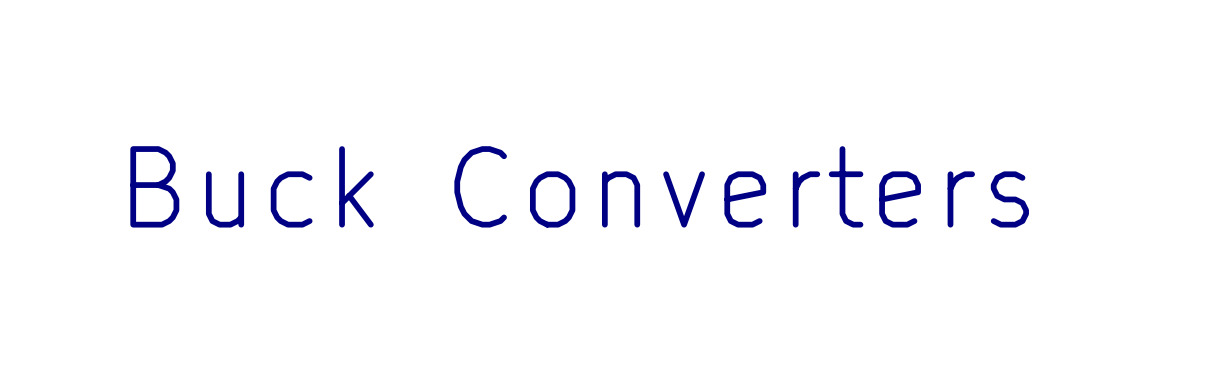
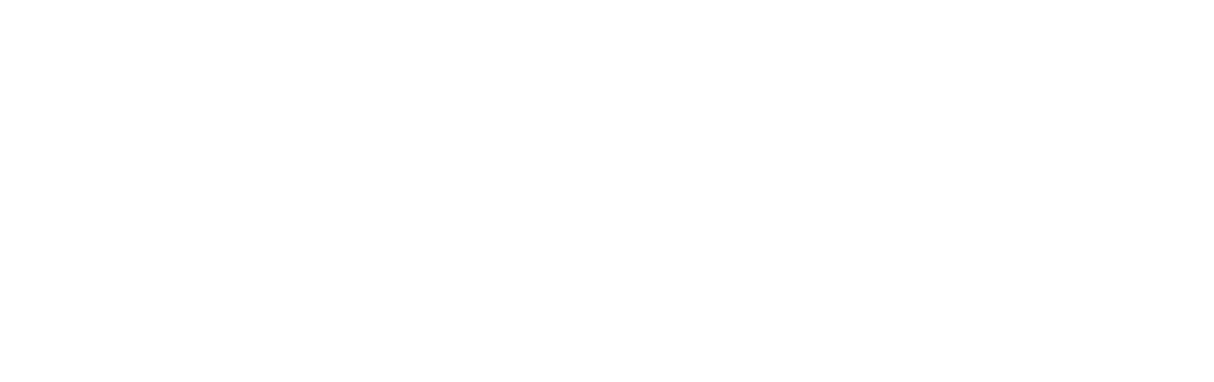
text: Buck Converters (579, 186) -> none

